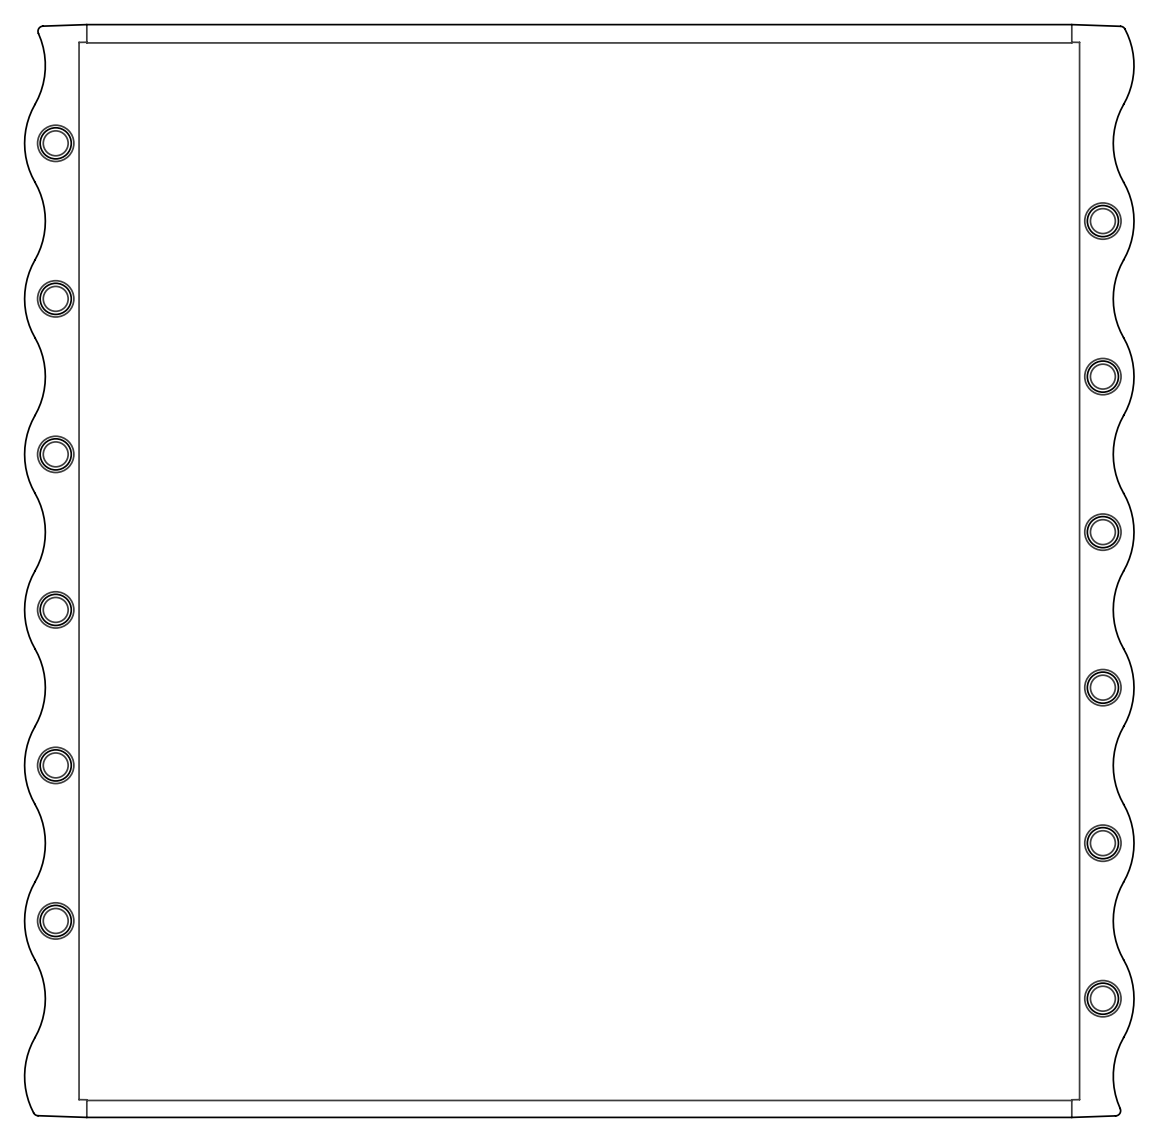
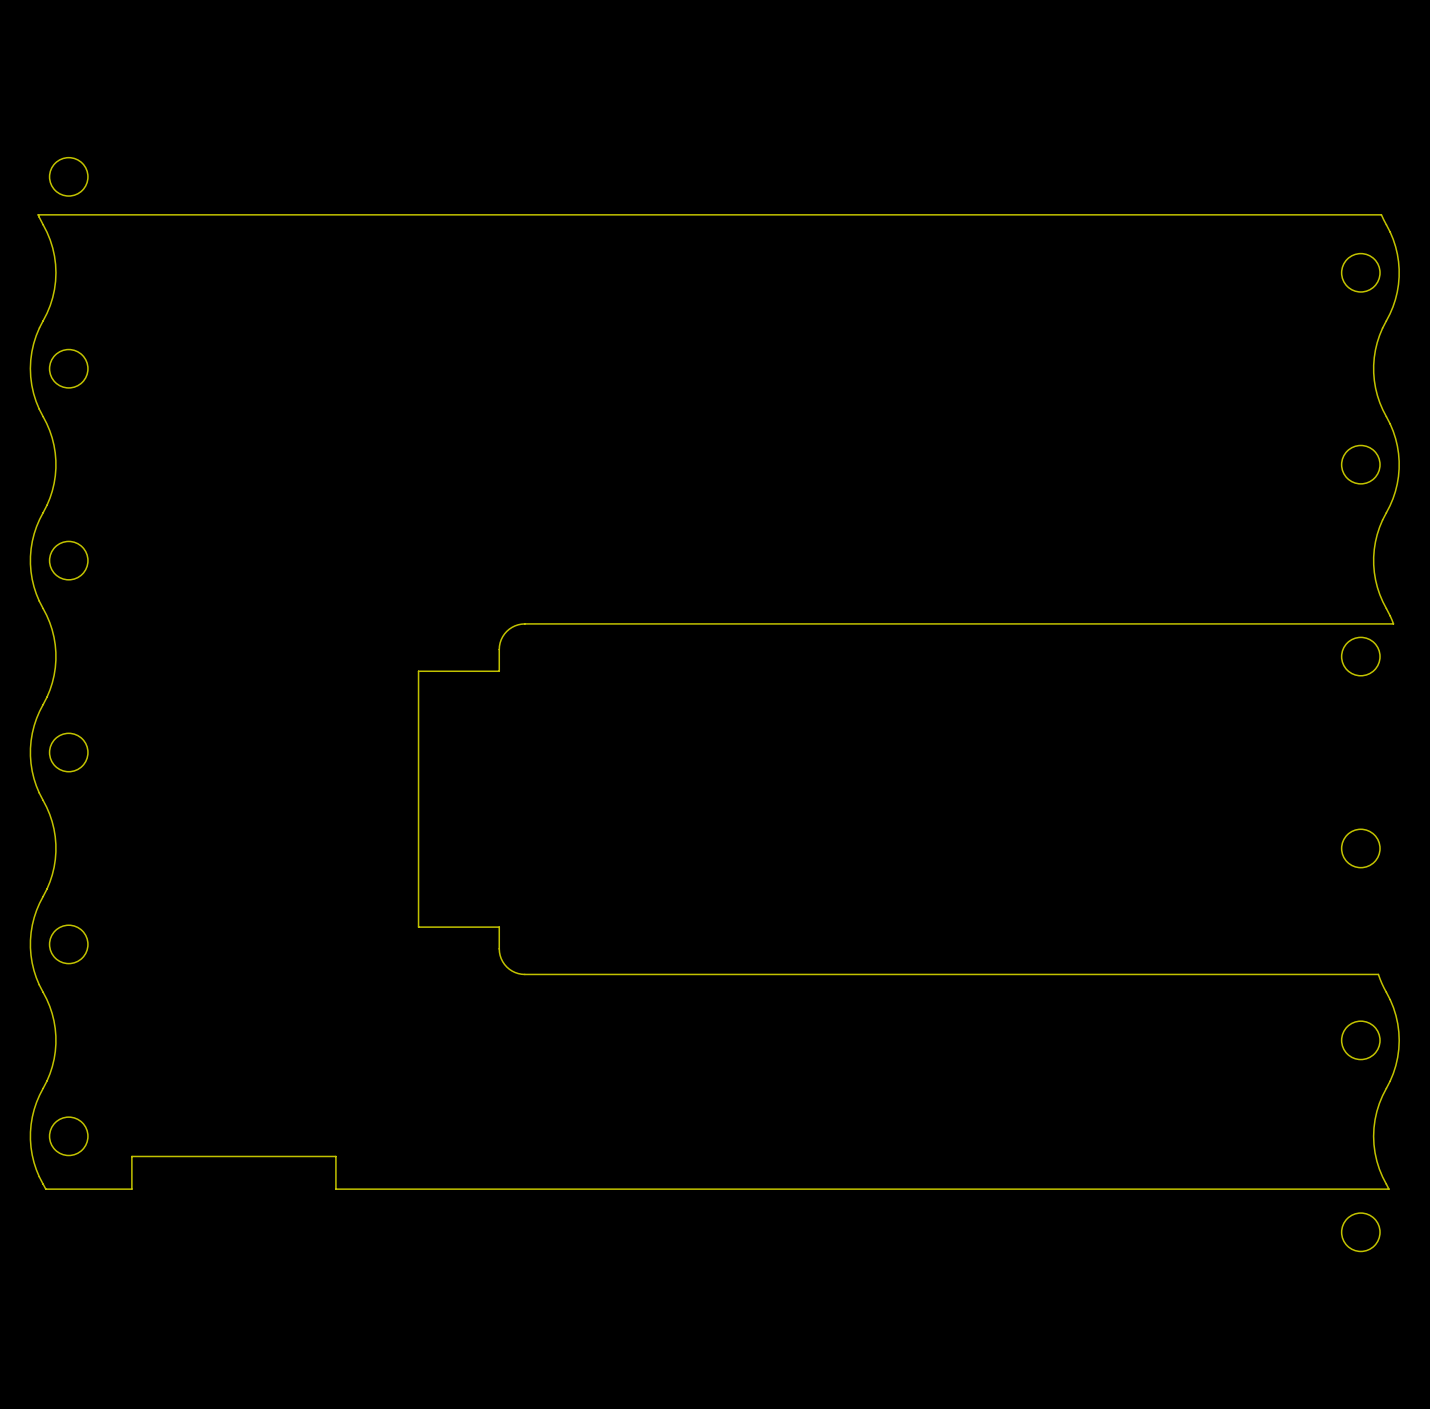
line: (86, 24) (86, 42) (1071, 42) (1071, 24) -> none
line: (86, 42) (79, 42) (79, 1099) (86, 1099) (86, 1117) -> none
line: (1071, 42) (1079, 42) (1079, 1099) (1071, 1099) (1071, 1117) -> none
drawing: [37, 125, 74, 162] -> none
board edge: (34, 182) (27, 163) (24, 136) (29, 116) (41, 91) (44, 76) (44, 54) (37, 31) (42, 26) (86, 24) (1071, 24) (1123, 27) (1131, 47) (1133, 66) (1131, 86) (1115, 123) (1113, 143) (1115, 163) (1129, 194) (1134, 221) (1131, 241) (1117, 272) (1113, 298) (1115, 318) (1129, 350) (1134, 376) (1131, 396) (1117, 427) (1113, 454) (1115, 474) (1129, 505) (1134, 532) (1129, 558) (1115, 589) (1113, 609) (1115, 630) (1129, 661) (1134, 687) (1131, 707) (1117, 738) (1113, 758) (1115, 785) (1129, 816) (1133, 836) (1131, 863) (1123, 882) -> (43, 224) (38, 214) (1381, 214) (1395, 246) (1399, 277) (1395, 299) (1377, 342) (1373, 372) (1377, 395) (1395, 438) (1399, 468) (1395, 491) (1377, 534) (1373, 564) (1379, 594) (1393, 623) (518, 624) (506, 631) (501, 639) (499, 671) (418, 671) (418, 927) (499, 927) (499, 952) (502, 961) (512, 971) (524, 974) (1378, 974) (1393, 1007) (1398, 1032) (1397, 1057) (1386, 1088)
drawing: [1084, 202, 1122, 240] -> none
board edge: (34, 259) (27, 278) (24, 305) (29, 325) (42, 356) (45, 383) (40, 403) (27, 434) (24, 454) (27, 474) (40, 505) (45, 532) (40, 558) (27, 589) (24, 609) (27, 630) (40, 661) (45, 687) (42, 707) (29, 738) (24, 765) (27, 785) (40, 816) (45, 843) (42, 863) (29, 894) (24, 920) (27, 941) (40, 972) (45, 998) (42, 1018) (27, 1055) (24, 1075) (26, 1094) (35, 1114) (86, 1117) (1071, 1117) (1116, 1115) (1120, 1110) (1114, 1087) (1114, 1065) (1117, 1050) (1129, 1025) (1133, 1005) (1131, 978) (1123, 959) -> (43, 320) (31, 351) (30, 376) (36, 401) (52, 437) (55, 468) (49, 498) (34, 533) (30, 564) (36, 594) (52, 629) (55, 660) (49, 690) (34, 725) (30, 755) (36, 785) (52, 821) (55, 851) (49, 881) (34, 917) (30, 947) (36, 977) (52, 1013) (55, 1043) (49, 1073) (34, 1109) (30, 1139) (33, 1162) (45, 1189) (131, 1189) (131, 1156) (335, 1156) (335, 1189) (1388, 1189) (1386, 1184)
drawing: [37, 280, 74, 318] -> none
drawing: [1084, 358, 1122, 395] -> none
drawing: [37, 436, 74, 473] -> none
drawing: [1084, 513, 1122, 551] -> none
drawing: [37, 591, 74, 629] -> none
drawing: [1084, 669, 1122, 706] -> none
drawing: [37, 747, 74, 784] -> none
drawing: [1084, 825, 1122, 862] -> none
drawing: [37, 902, 74, 940] -> none
drawing: [1084, 980, 1122, 1017] -> none
line: (86, 1100) (1071, 1100) -> none

